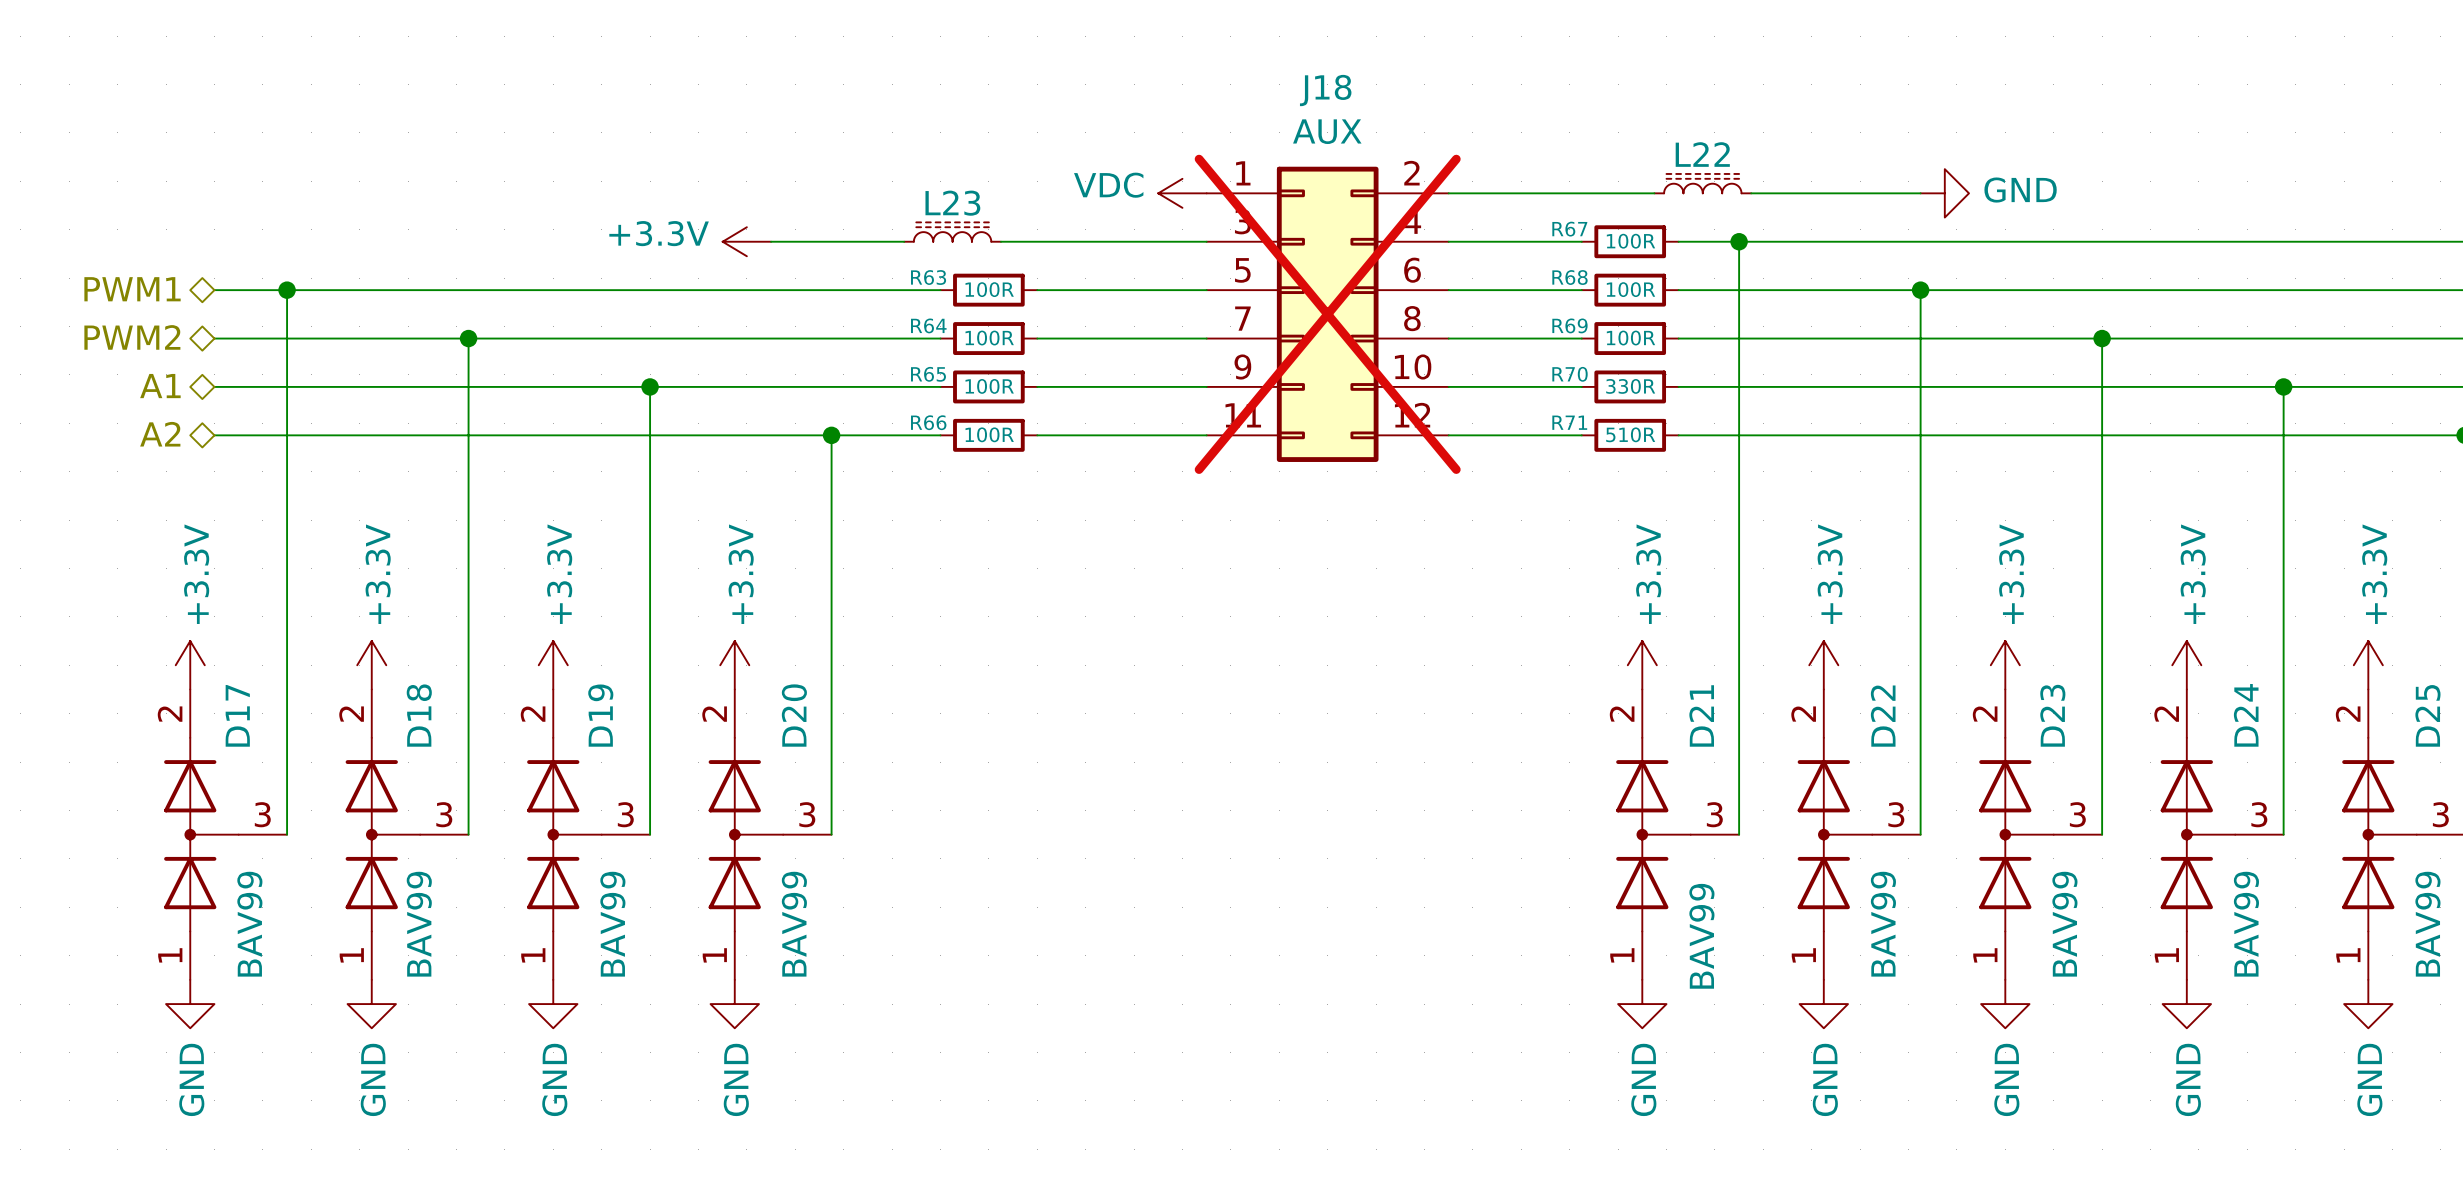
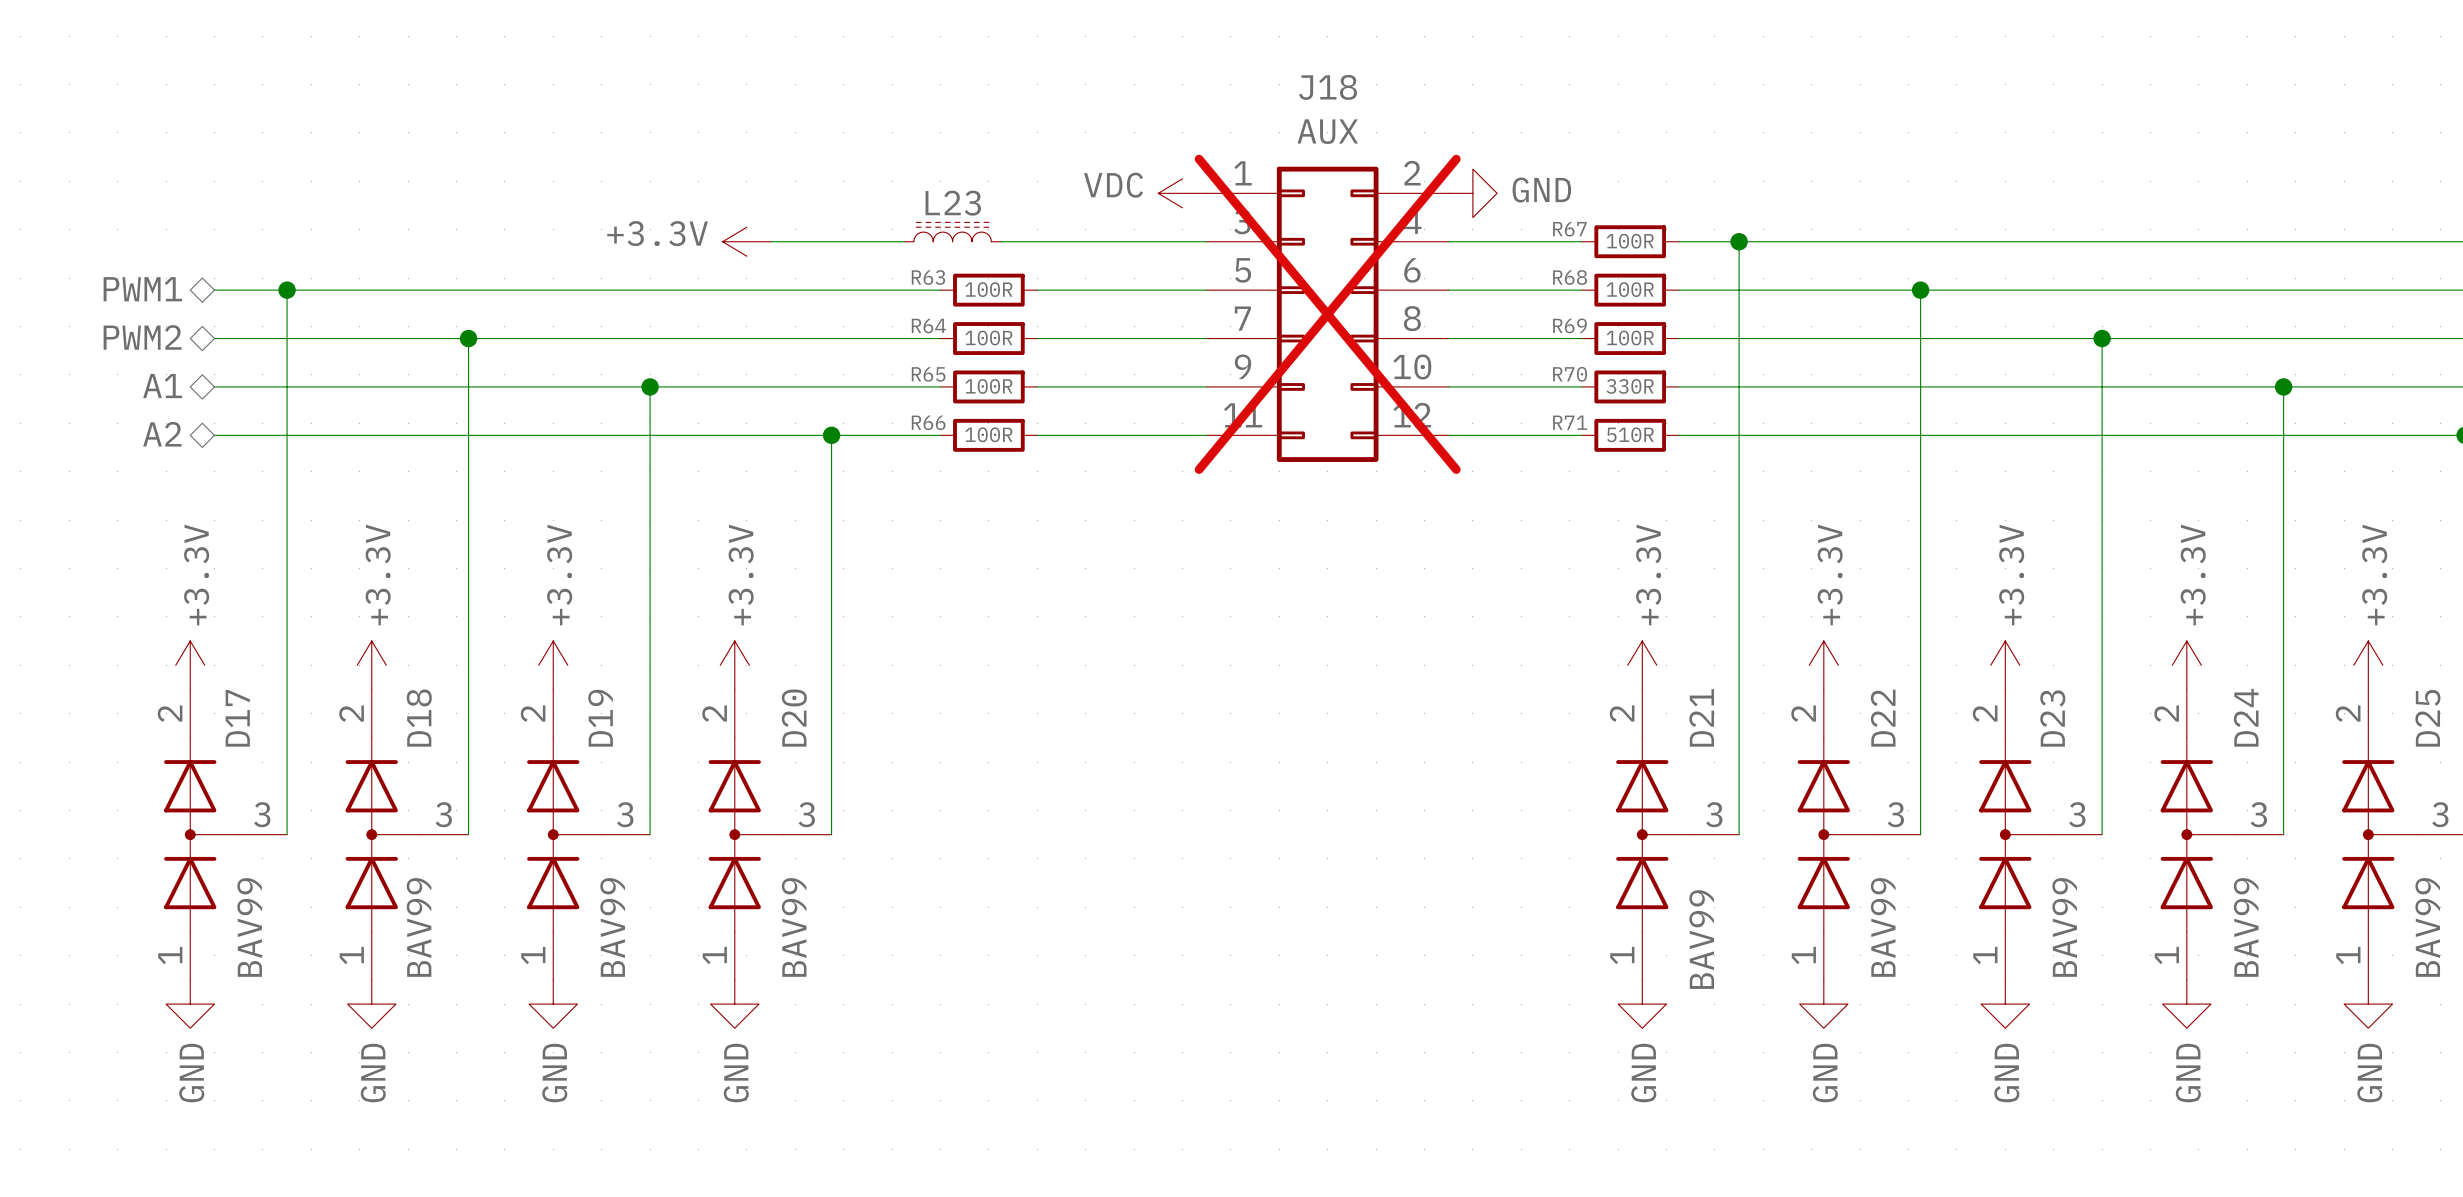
L22: (1702, 183) -> none
wire: (1448, 193) (1654, 193) -> none
wire: (1751, 193) (1920, 193) -> none
power symbol position: GND (1944, 193) -> GND (1472, 193)

